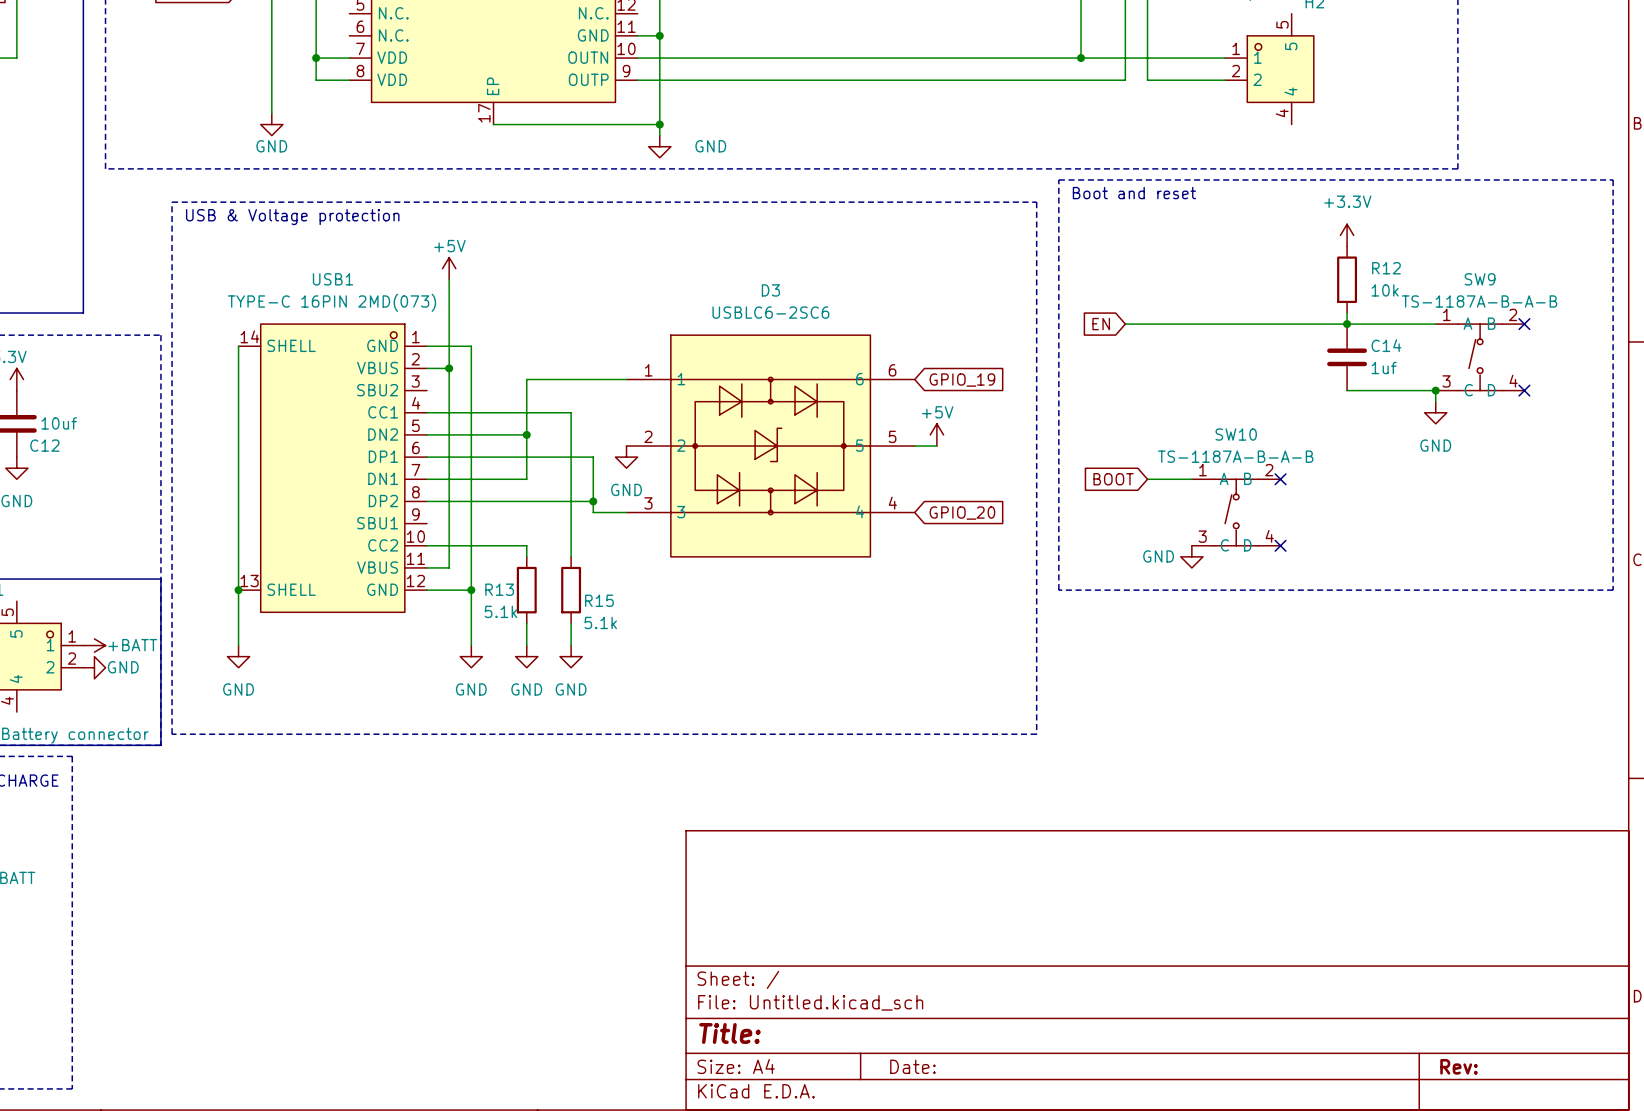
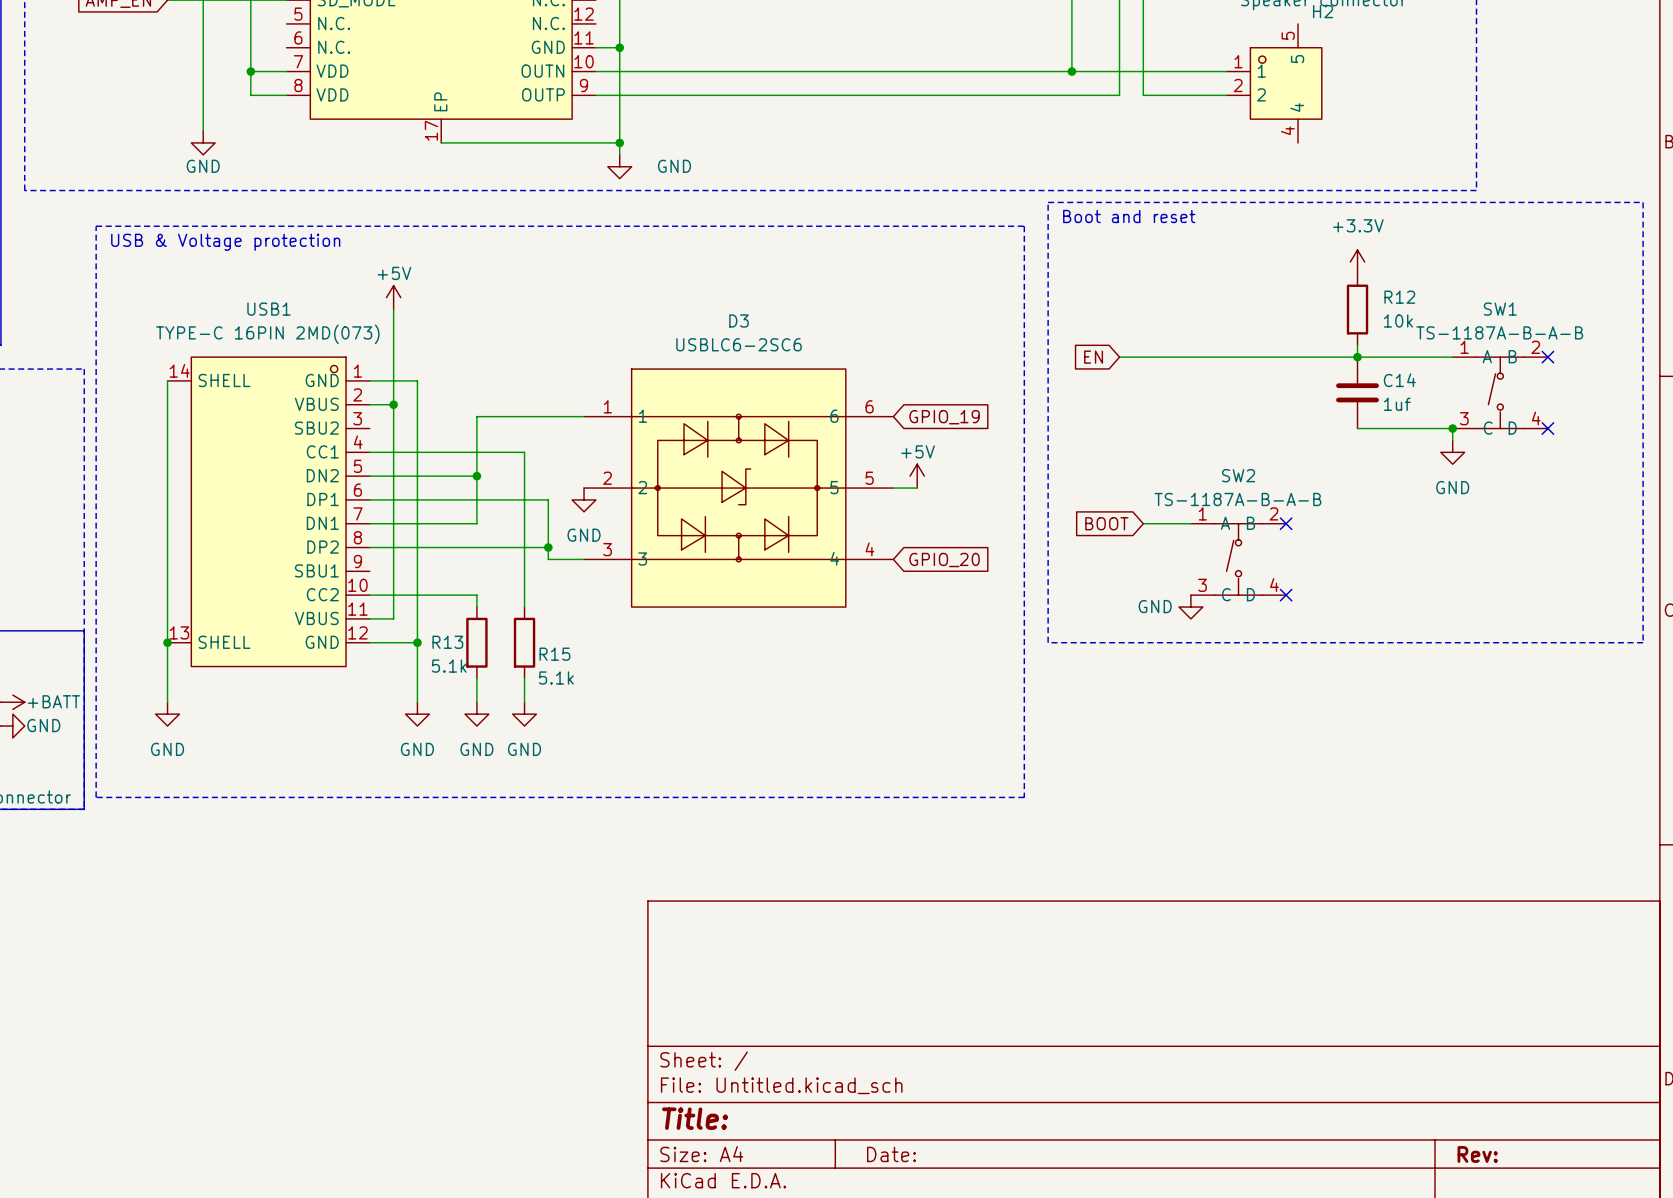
SW9 name: SW9 (1480, 279) -> SW1 (1500, 309)
SW10 name: SW10 (1236, 434) -> SW2 (1238, 475)

